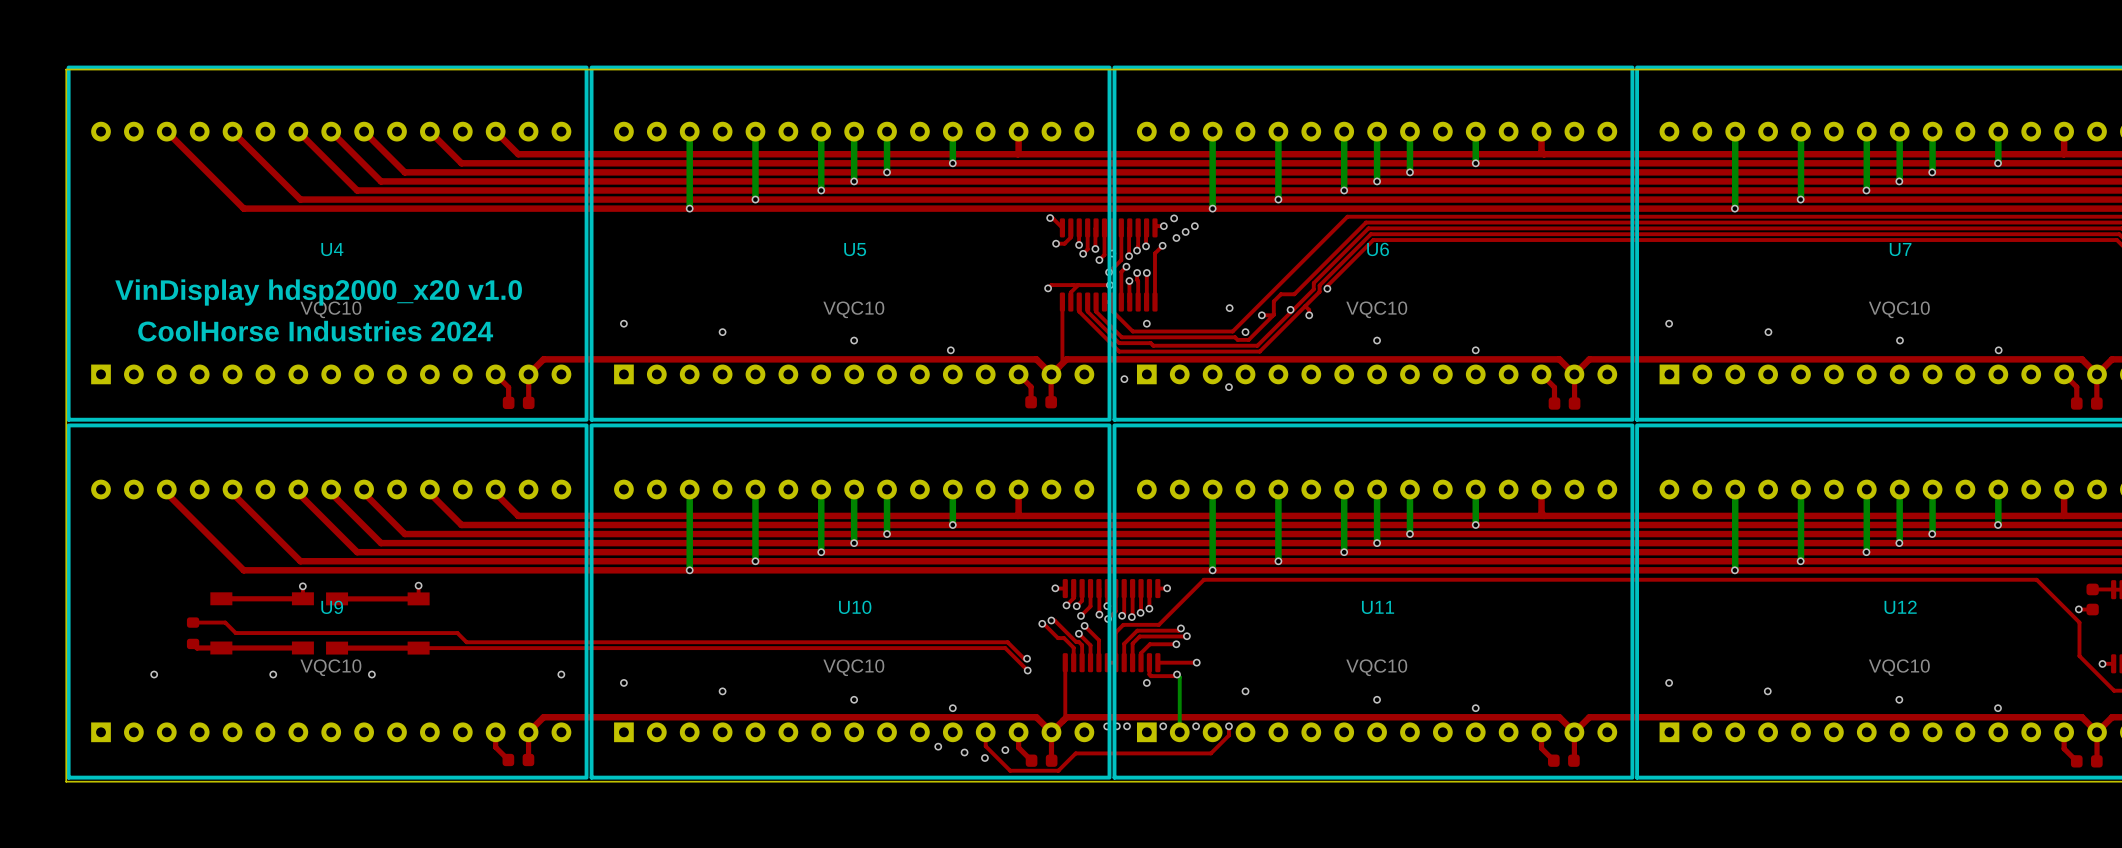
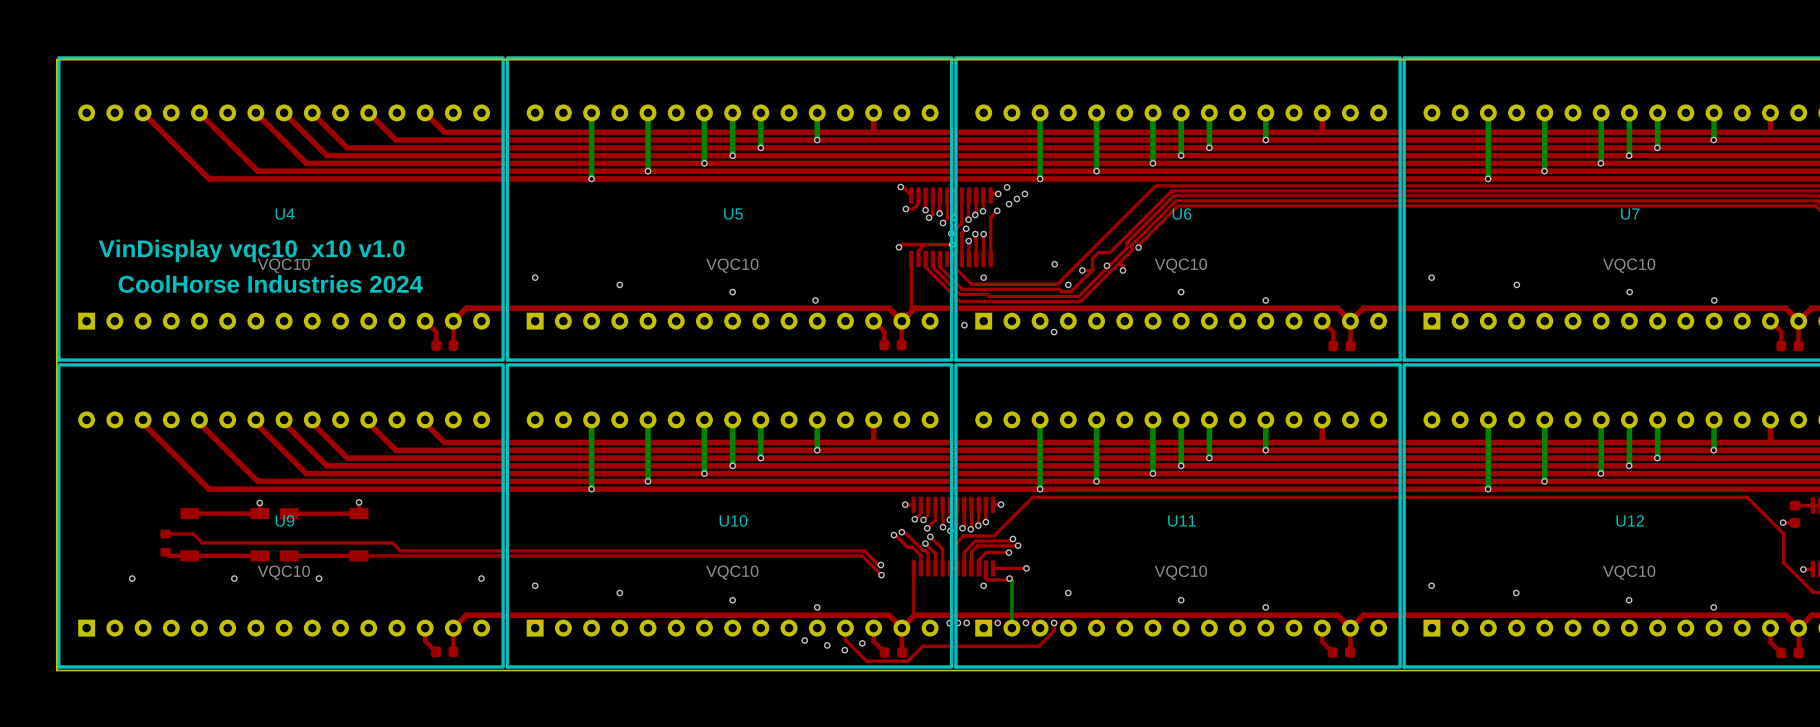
text: VinDisplay hdsp2000_x20 v1.0 (318, 292) -> VinDisplay vqc10_x10 v1.0 (251, 250)

